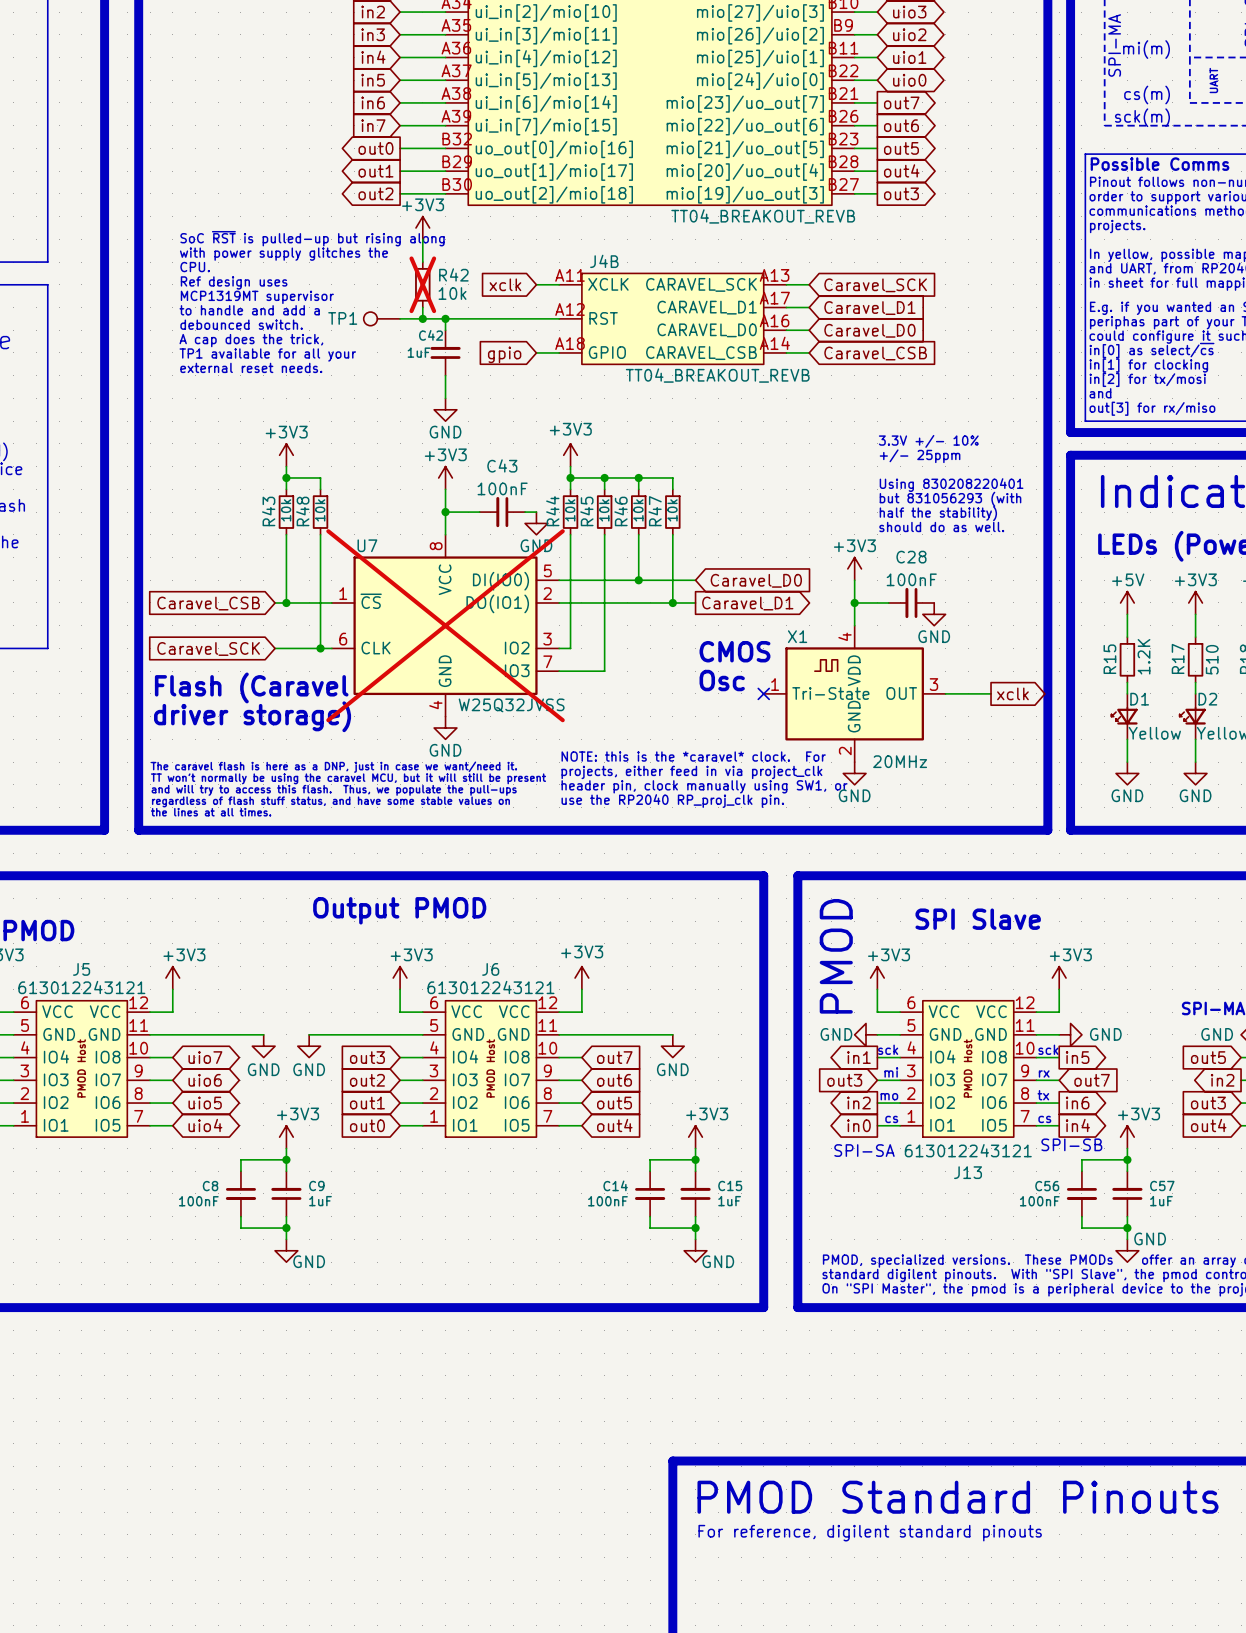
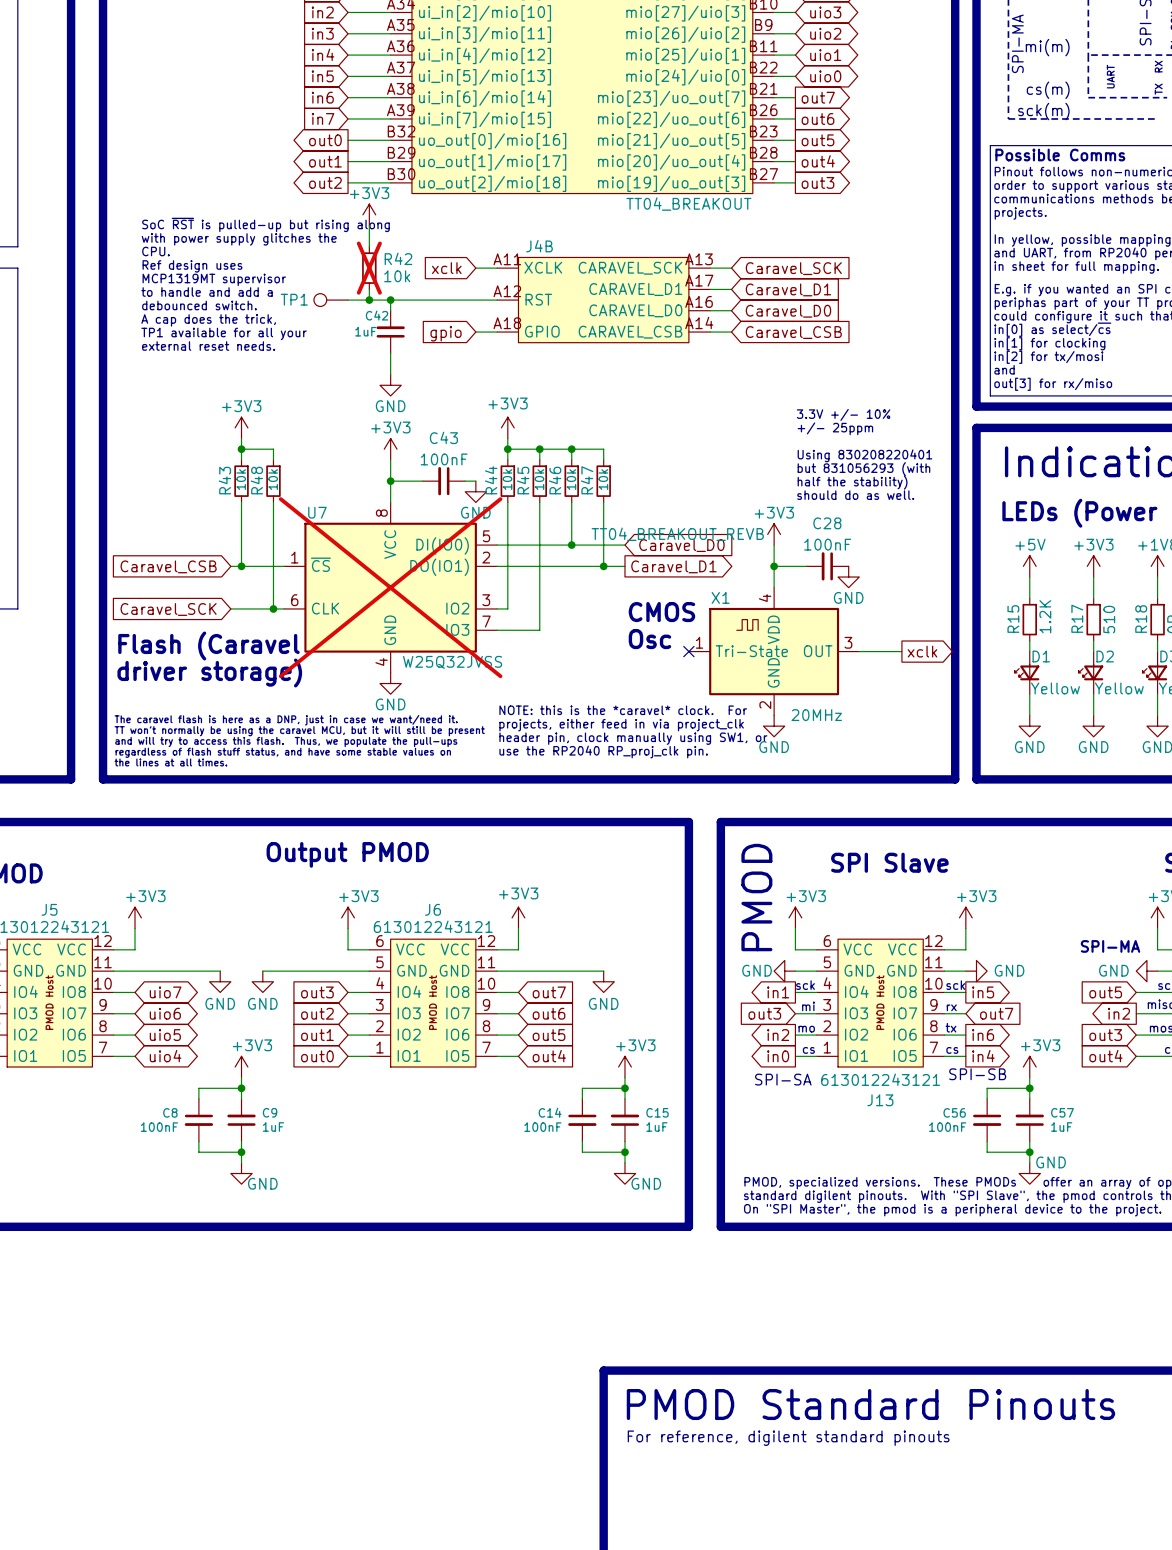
part value: TT04_BREAKOUT_REVB (763, 216) -> TT04_BREAKOUT (688, 204)
J4B value position: TT04_BREAKOUT_REVB (717, 375) -> TT04_BREAKOUT_REVB (677, 534)

